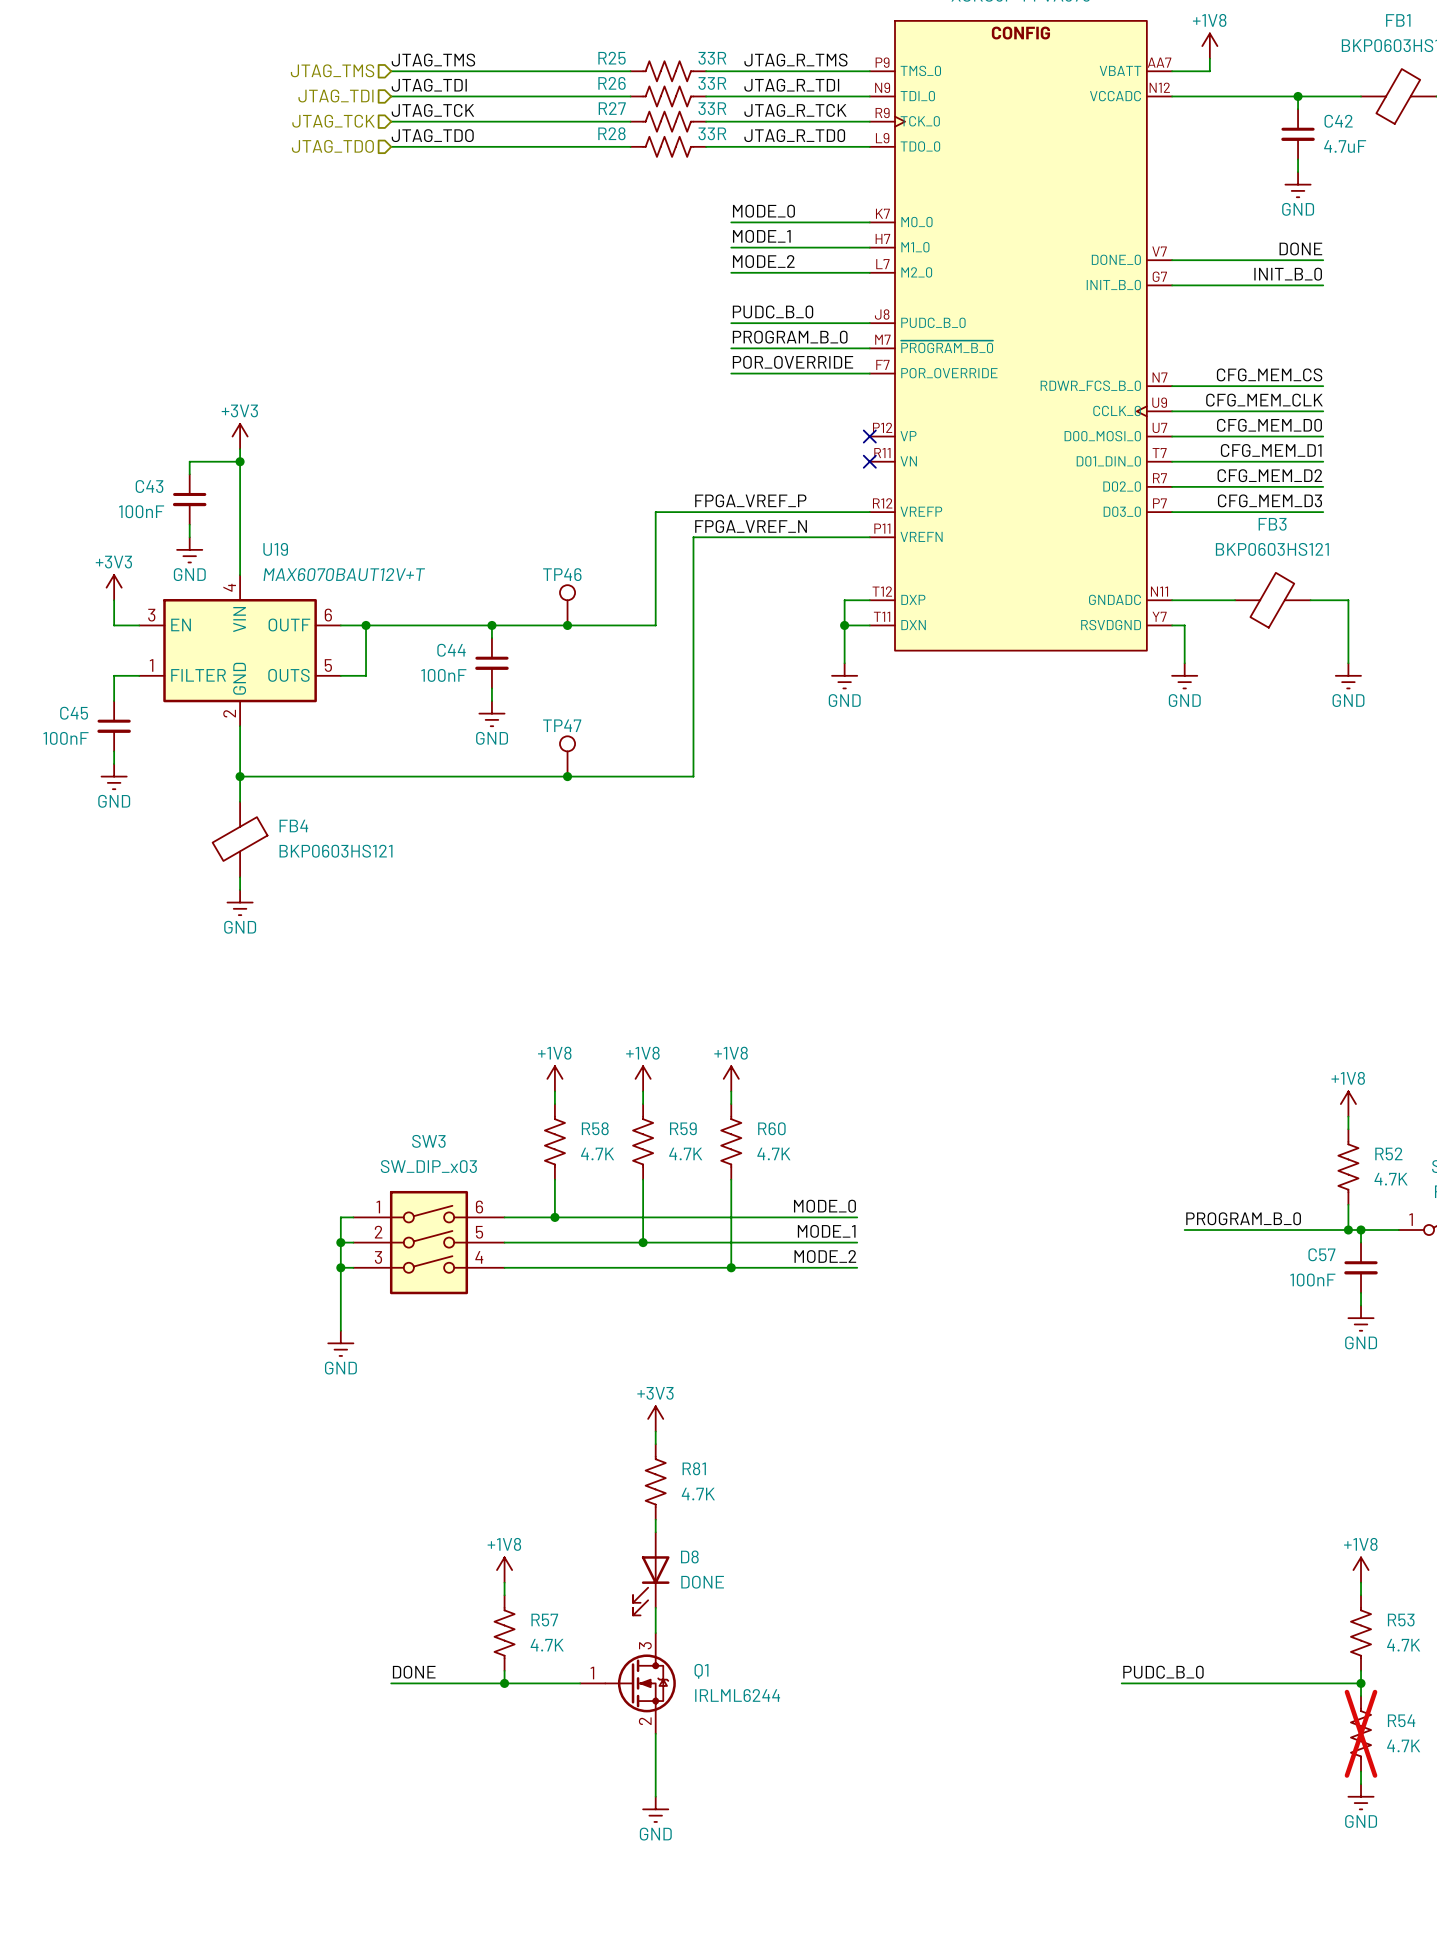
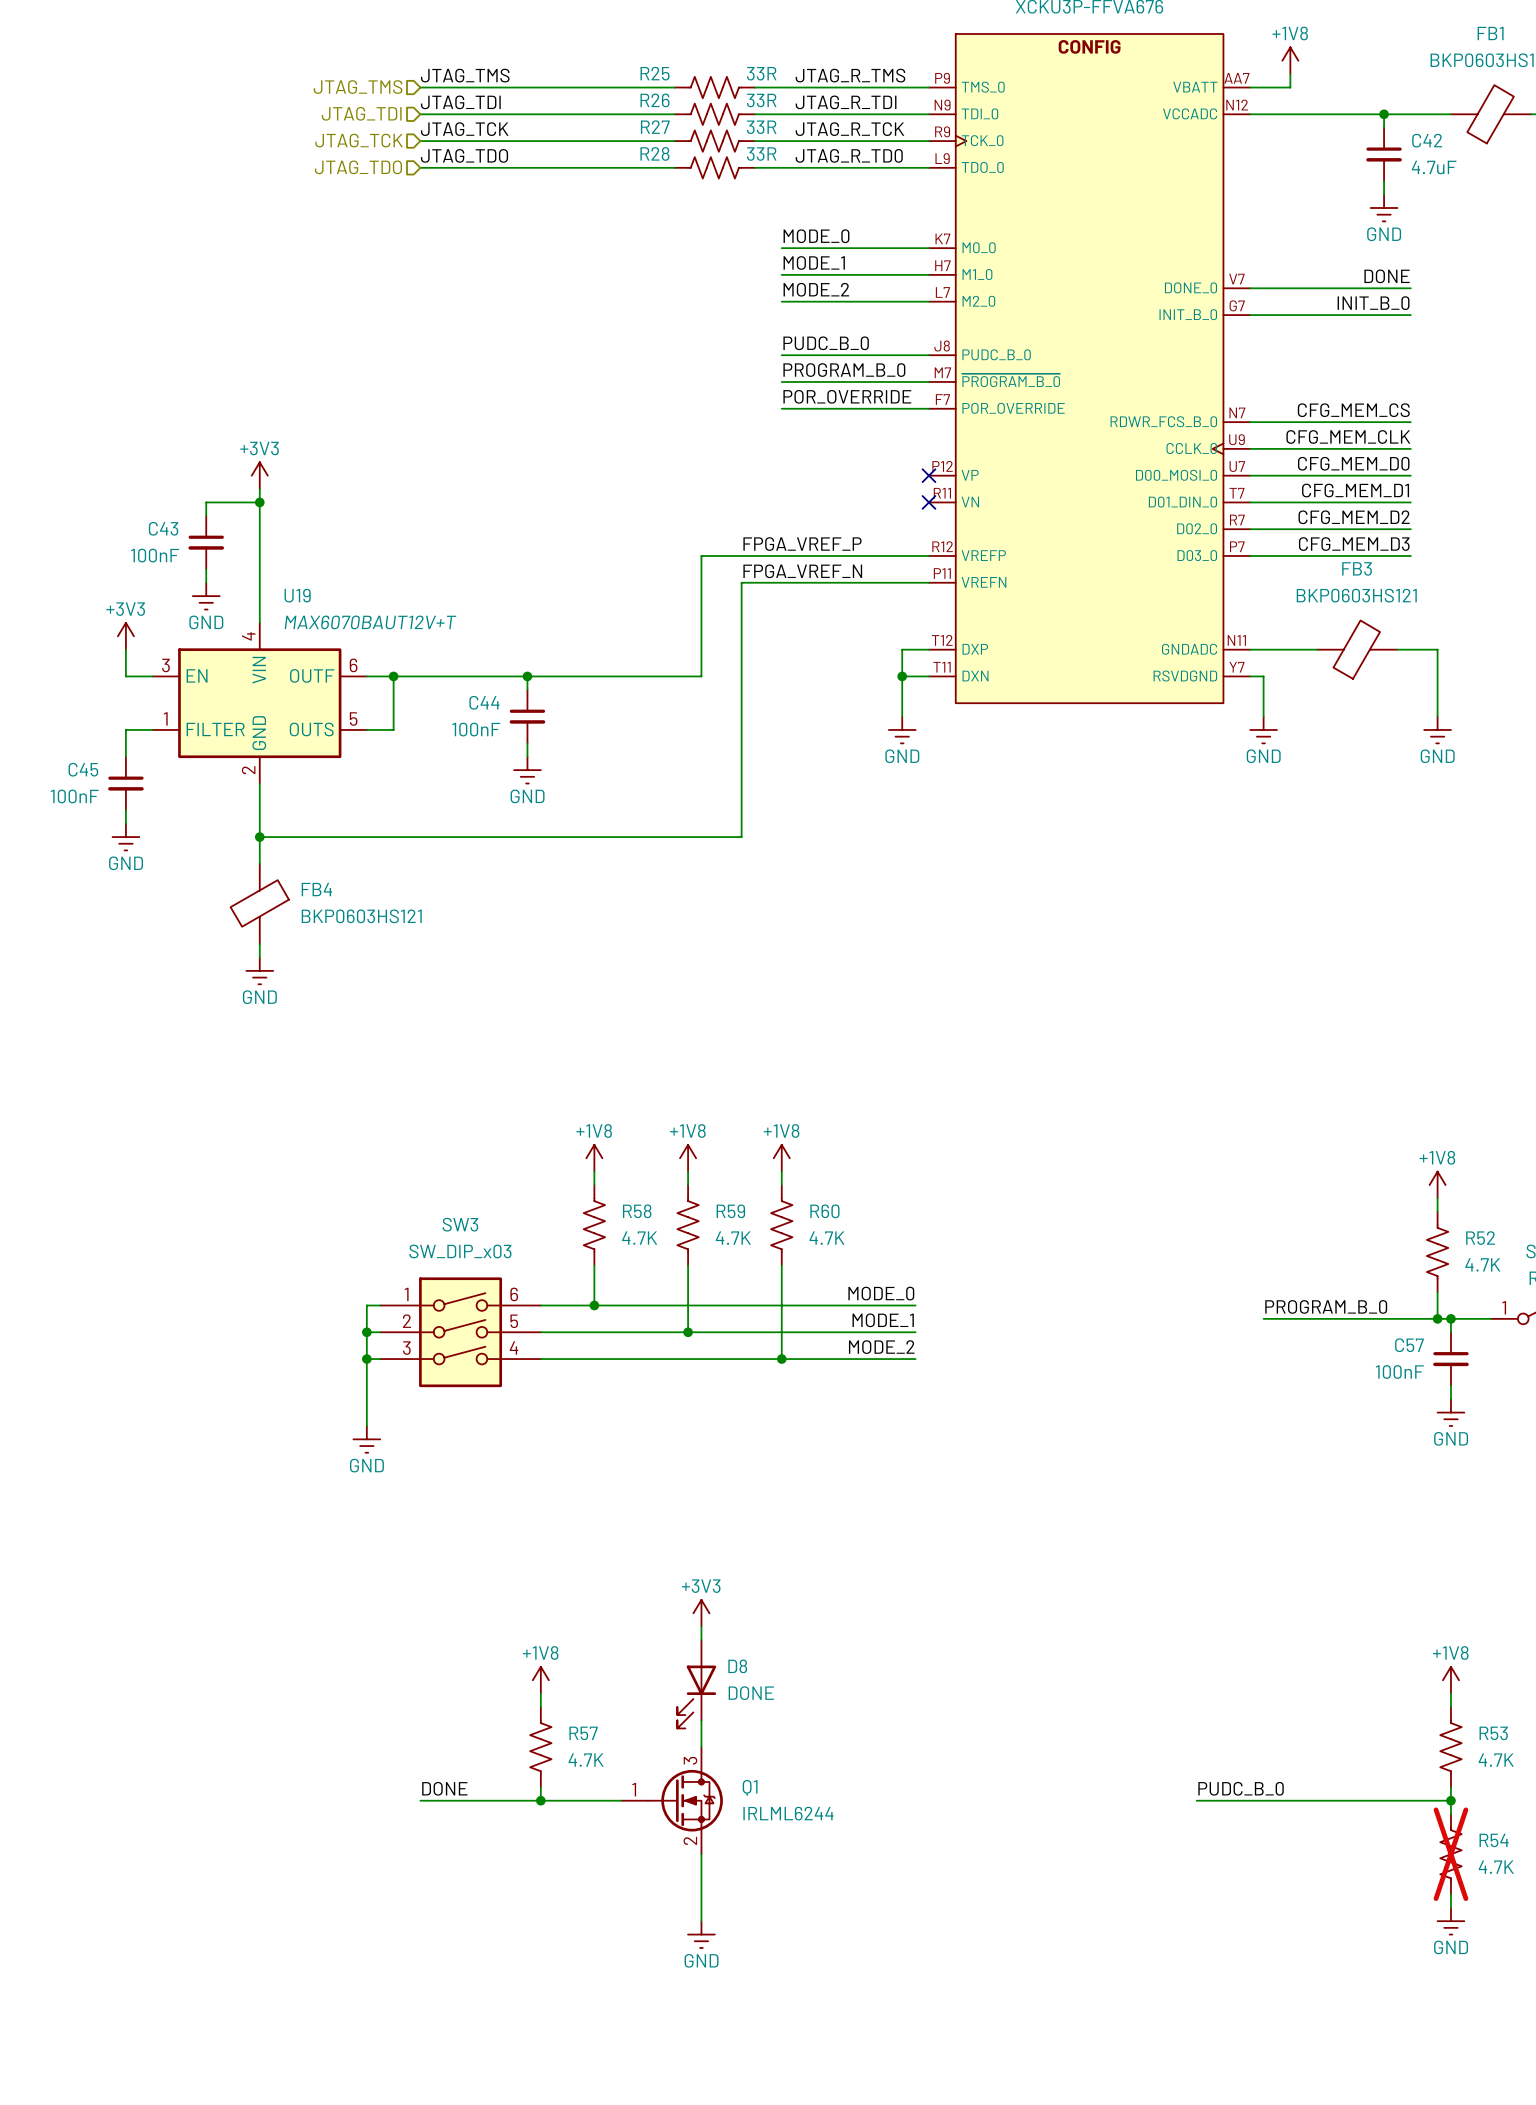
TP46: (567, 605) -> none
junction: (567, 625) -> none
TP47: (567, 756) -> none
junction: (567, 776) -> none
power symbol position: +3V3 (655, 1418) -> +3V3 (701, 1613)
wire: (655, 1431) (655, 1444) -> none
R81: 4.7K (655, 1481) -> none

